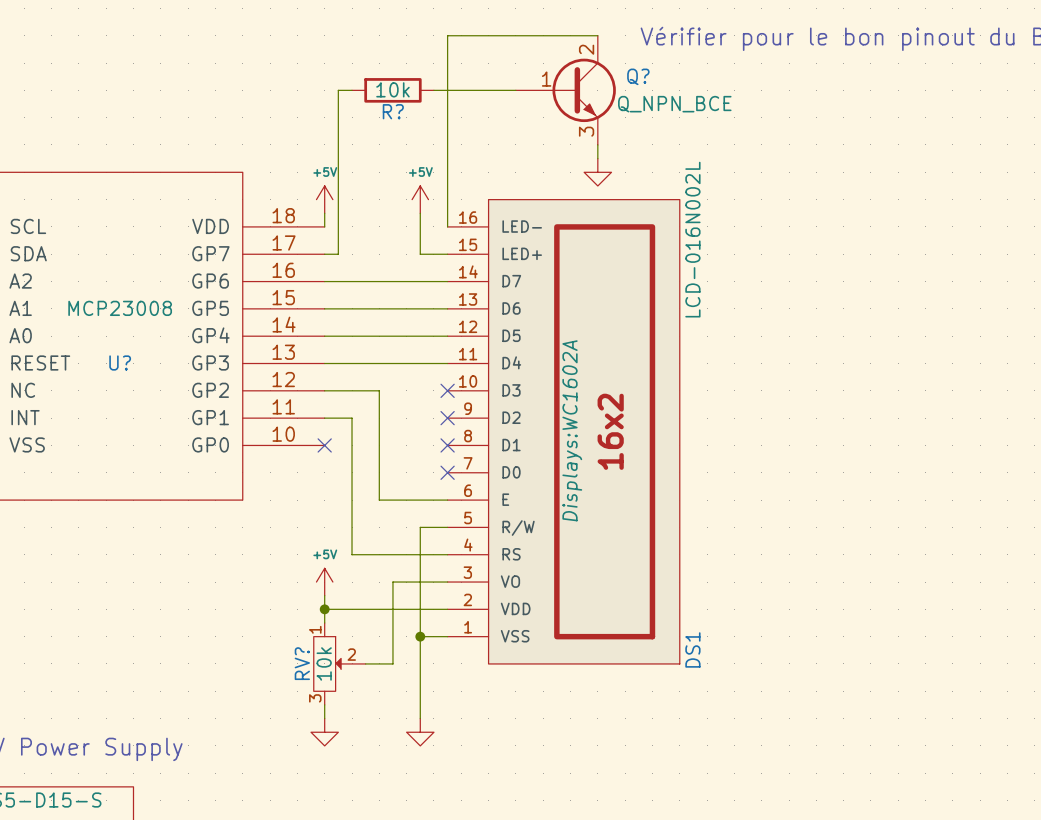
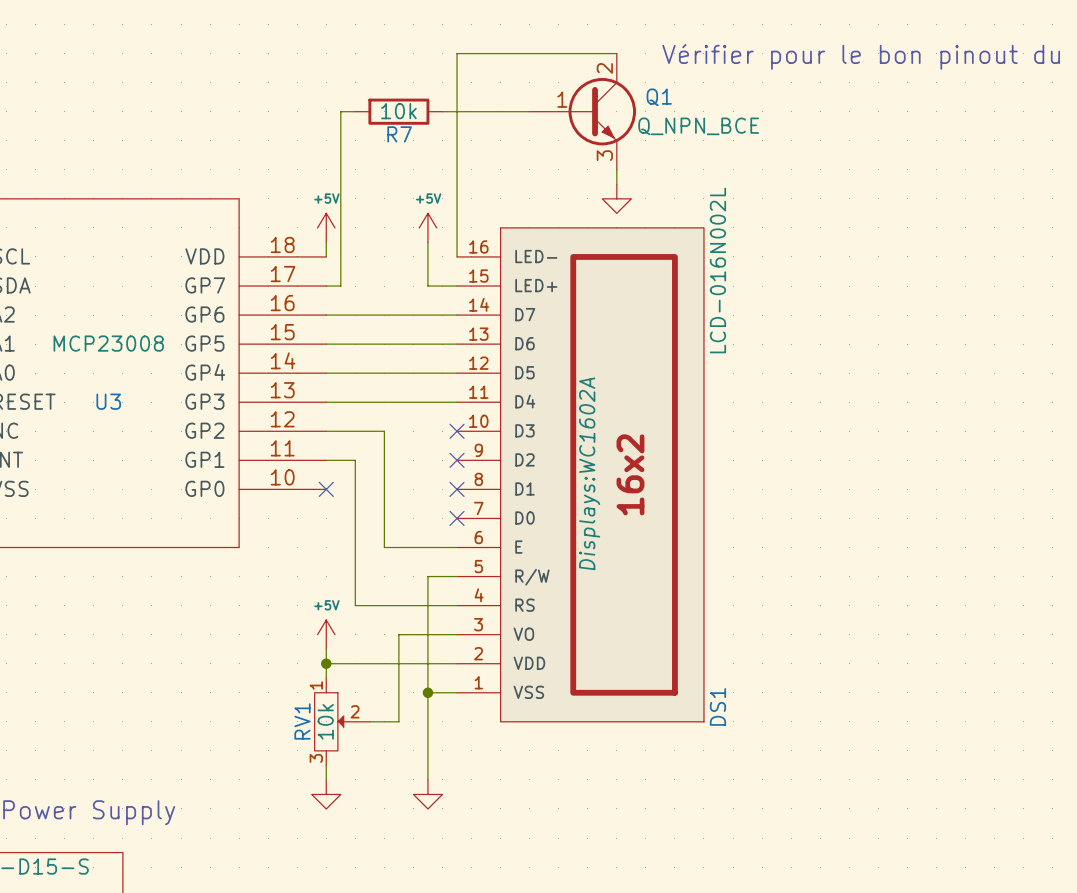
Q? name: Q? (638, 76) -> Q1 (659, 97)
R? name: R? (393, 111) -> R7 (399, 134)
U? name: U? (120, 363) -> U3 (108, 401)
RV? name: RV? (302, 663) -> RV1 (302, 721)

